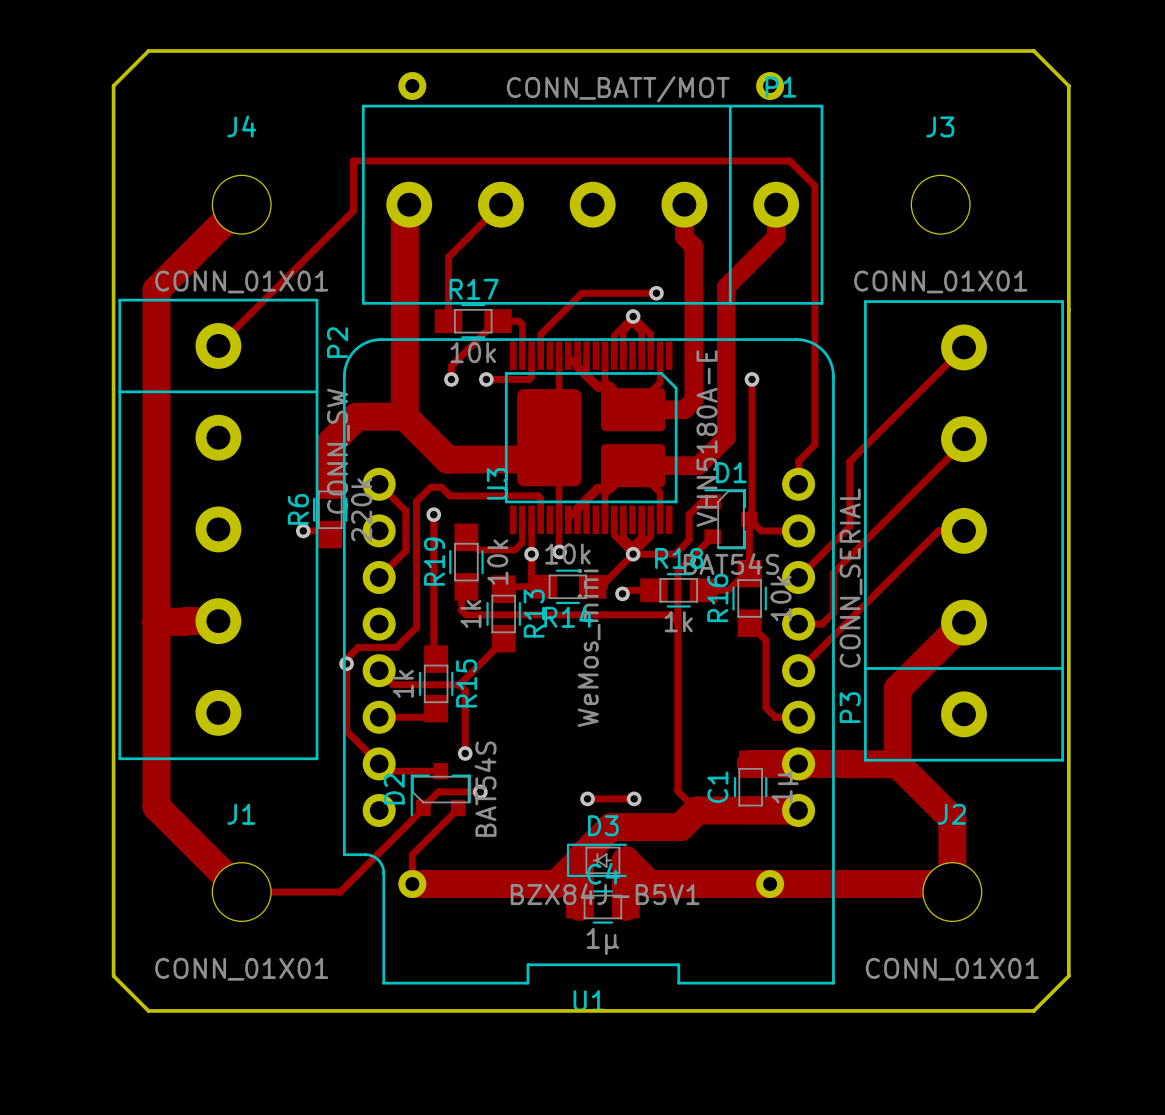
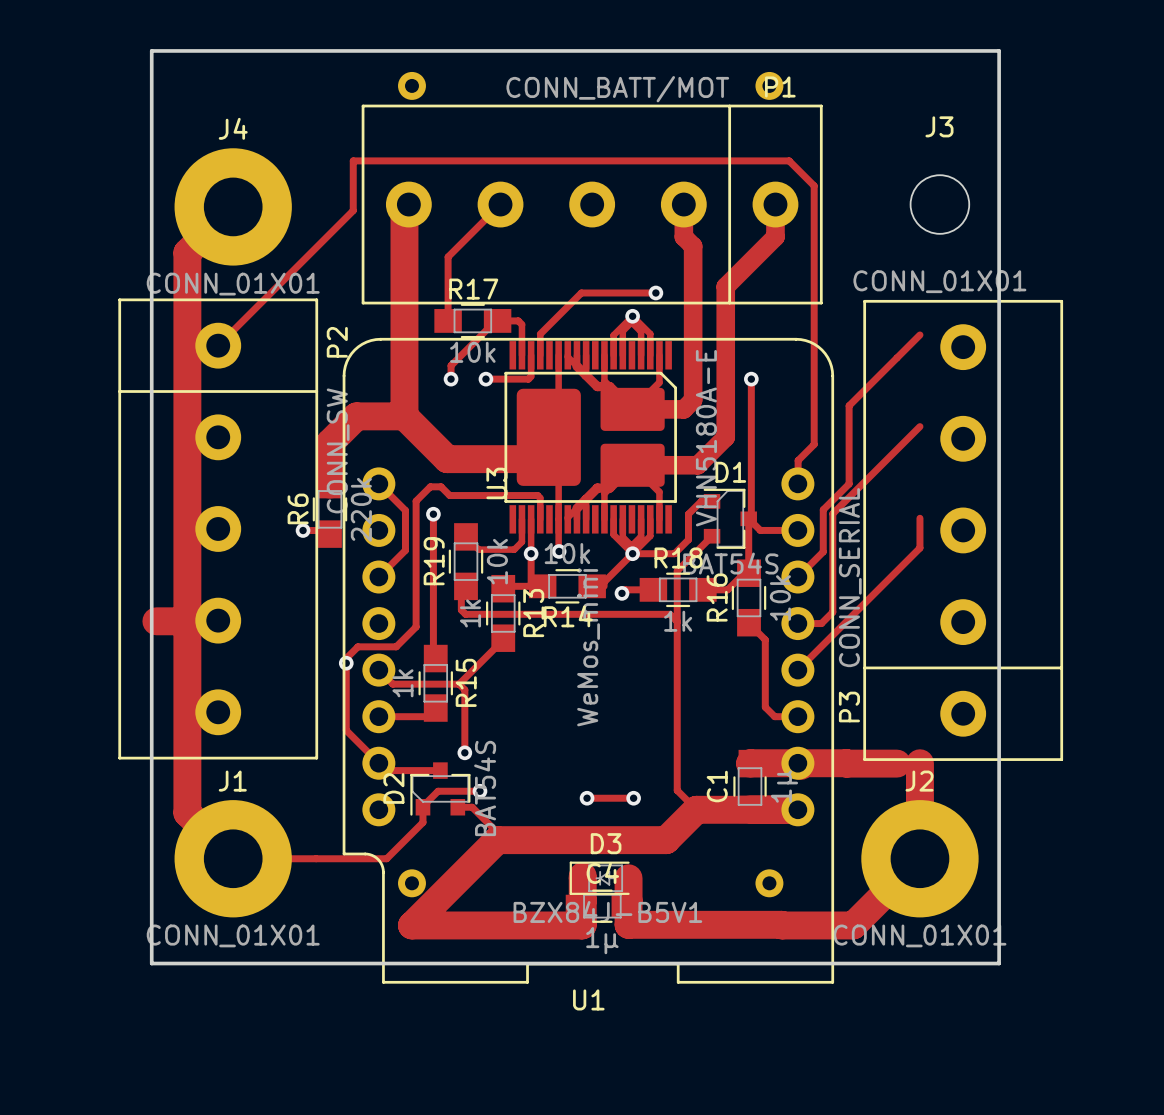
board edge: (151, 50) (148, 50) (113, 85) (113, 975) (148, 1010) (1033, 1010) (1068, 975) (1068, 85) (1033, 50) (999, 50) -> (151, 50) (151, 963) (999, 963) (999, 50)
J4 footprint: [212, 175, 272, 235] -> [174, 148, 292, 266]
track: (241, 204) (156, 289) (156, 806) (241, 892) (340, 892) (423, 808) -> (233, 206) (187, 252) (187, 812) (233, 858) (386, 858) (422, 822) (422, 808)
track: (963, 347) (849, 461) -> (919, 334) (849, 405) (849, 461)
track: (963, 439) (963, 442) (833, 572) -> (919, 426) (832, 513) (832, 572)
track: (849, 484) (849, 526) (823, 552) -> (849, 483) (823, 509) (823, 551)
track: (963, 530) (938, 530) (798, 670) -> (919, 518) (919, 548) (797, 670)
track: (963, 622) (897, 688) (897, 764) (952, 818) (952, 892) (944, 884) (649, 884) (625, 860) (625, 906) -> none
track: none -> (919, 763) (919, 858) (853, 925) (628, 924) (628, 878)
track: none -> (457, 807) (472, 807) (497, 832) (497, 840)
track: (458, 808) (412, 854) (412, 884) (556, 884) (579, 860) -> none
track: (680, 827) (610, 827) (579, 858) (579, 906) -> (679, 826) (666, 840) (497, 840)
track: none -> (497, 840) (411, 925) (582, 925) (582, 876)
D3 position: (600, 860) -> (603, 878)
J1 footprint: [212, 862, 272, 922] -> [174, 800, 292, 918]
J2 footprint: [922, 862, 982, 922] -> [861, 800, 979, 918]

